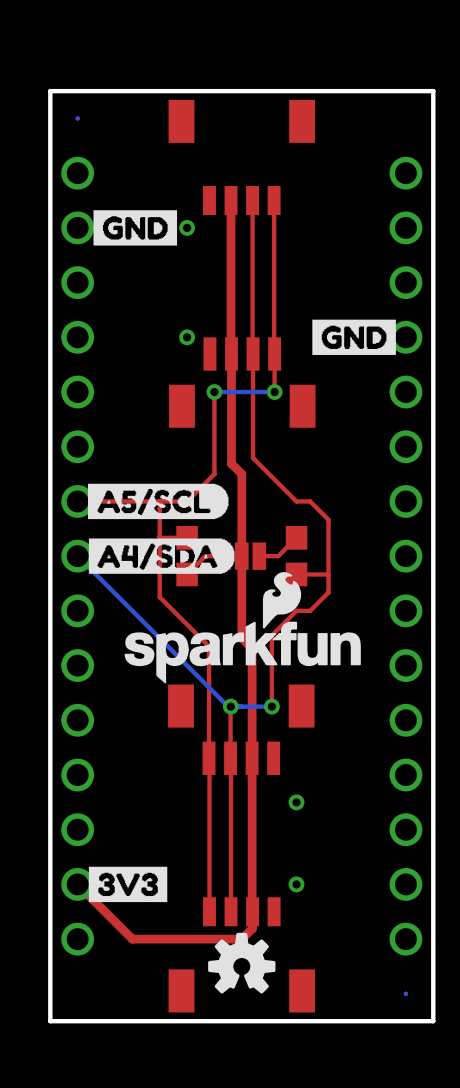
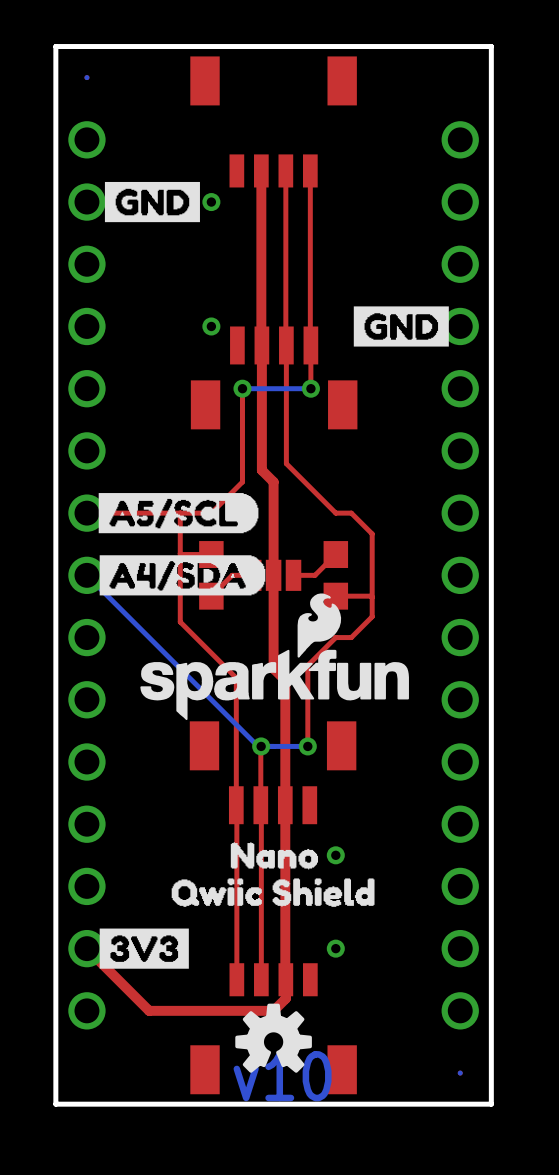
drawing: none -> [171, 842, 375, 907]
text: none -> v10 (282, 1076)

